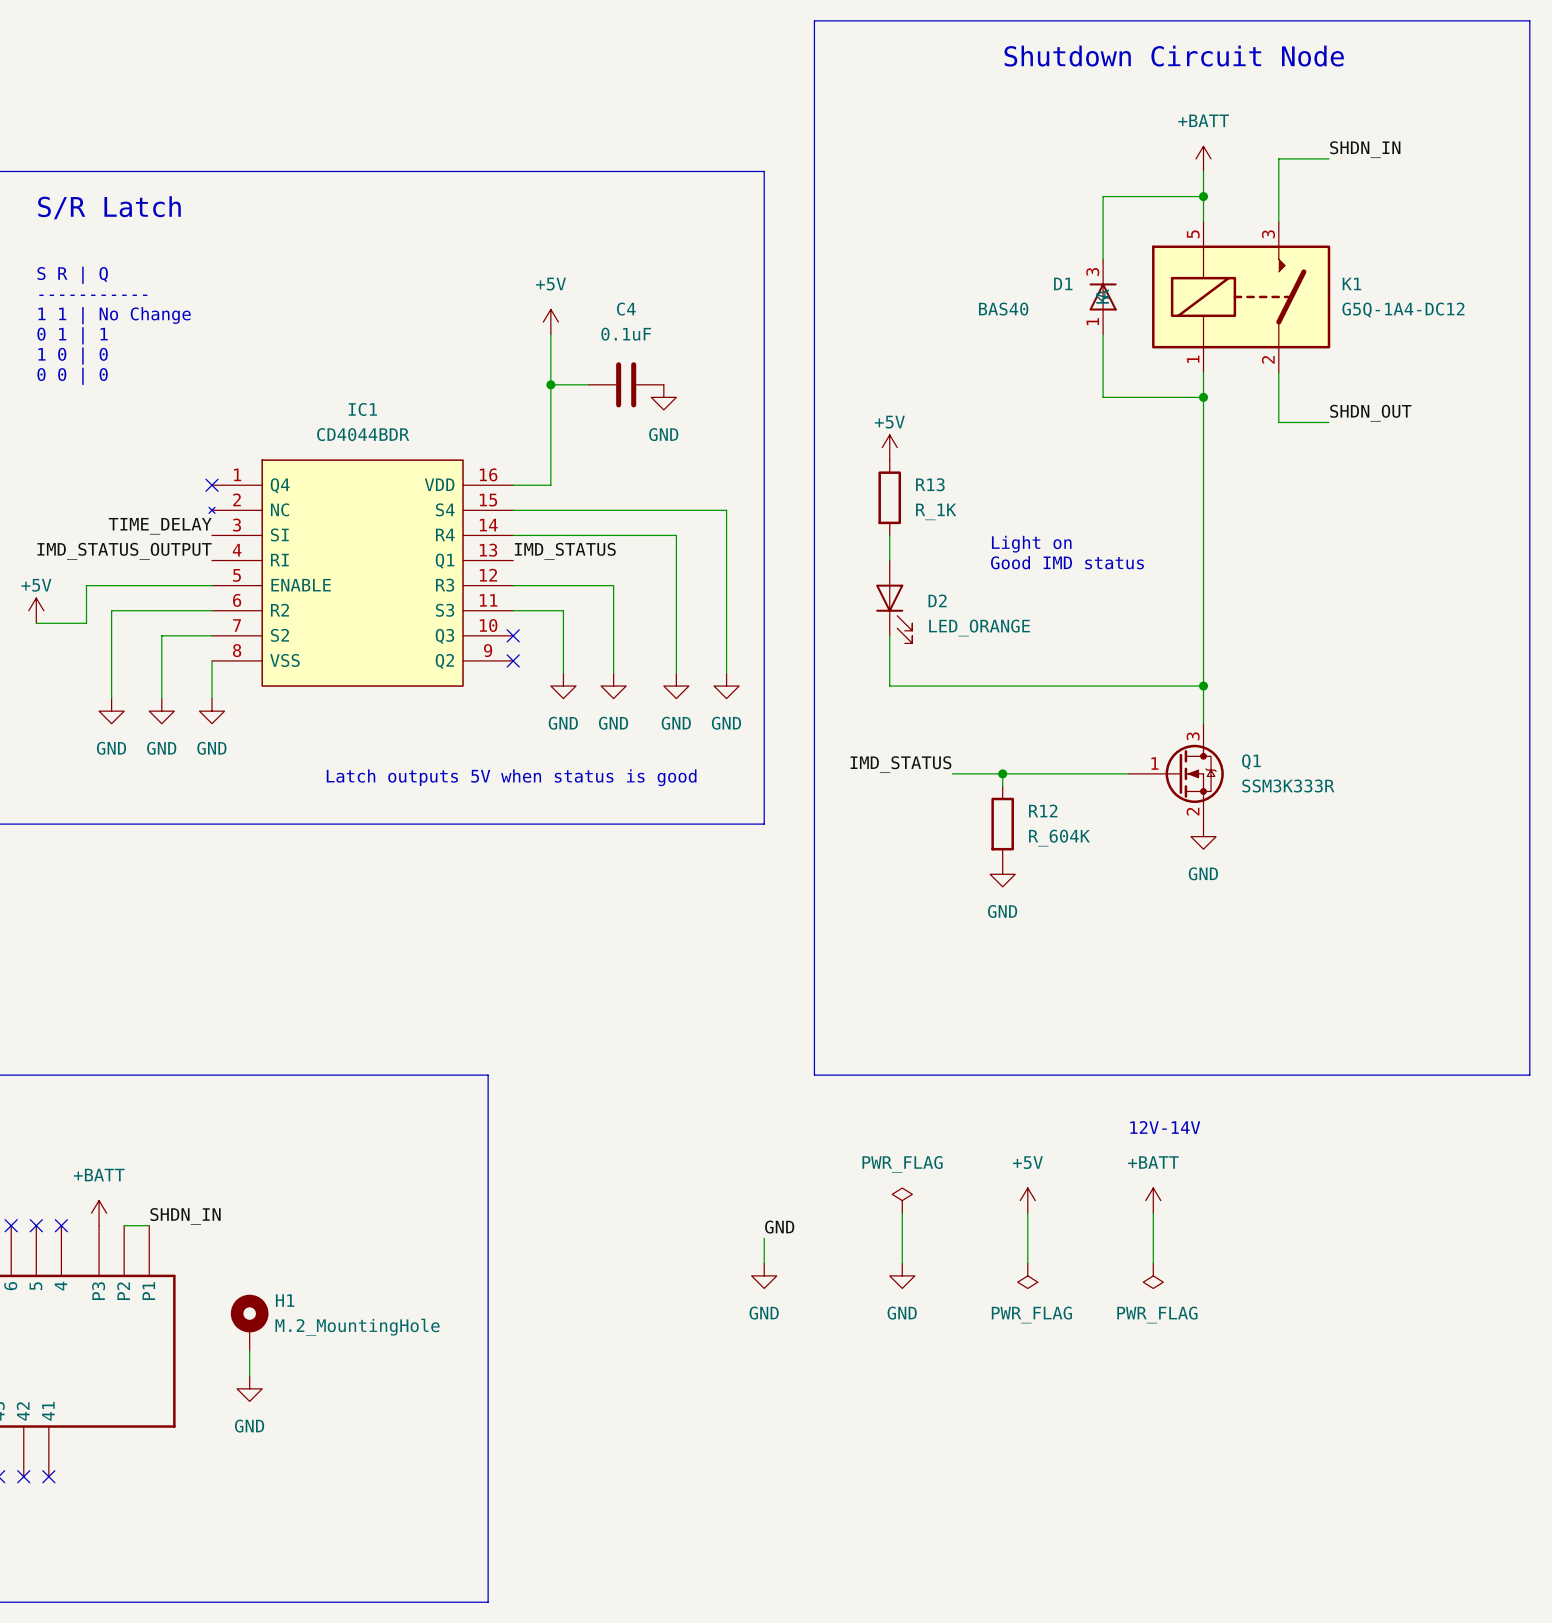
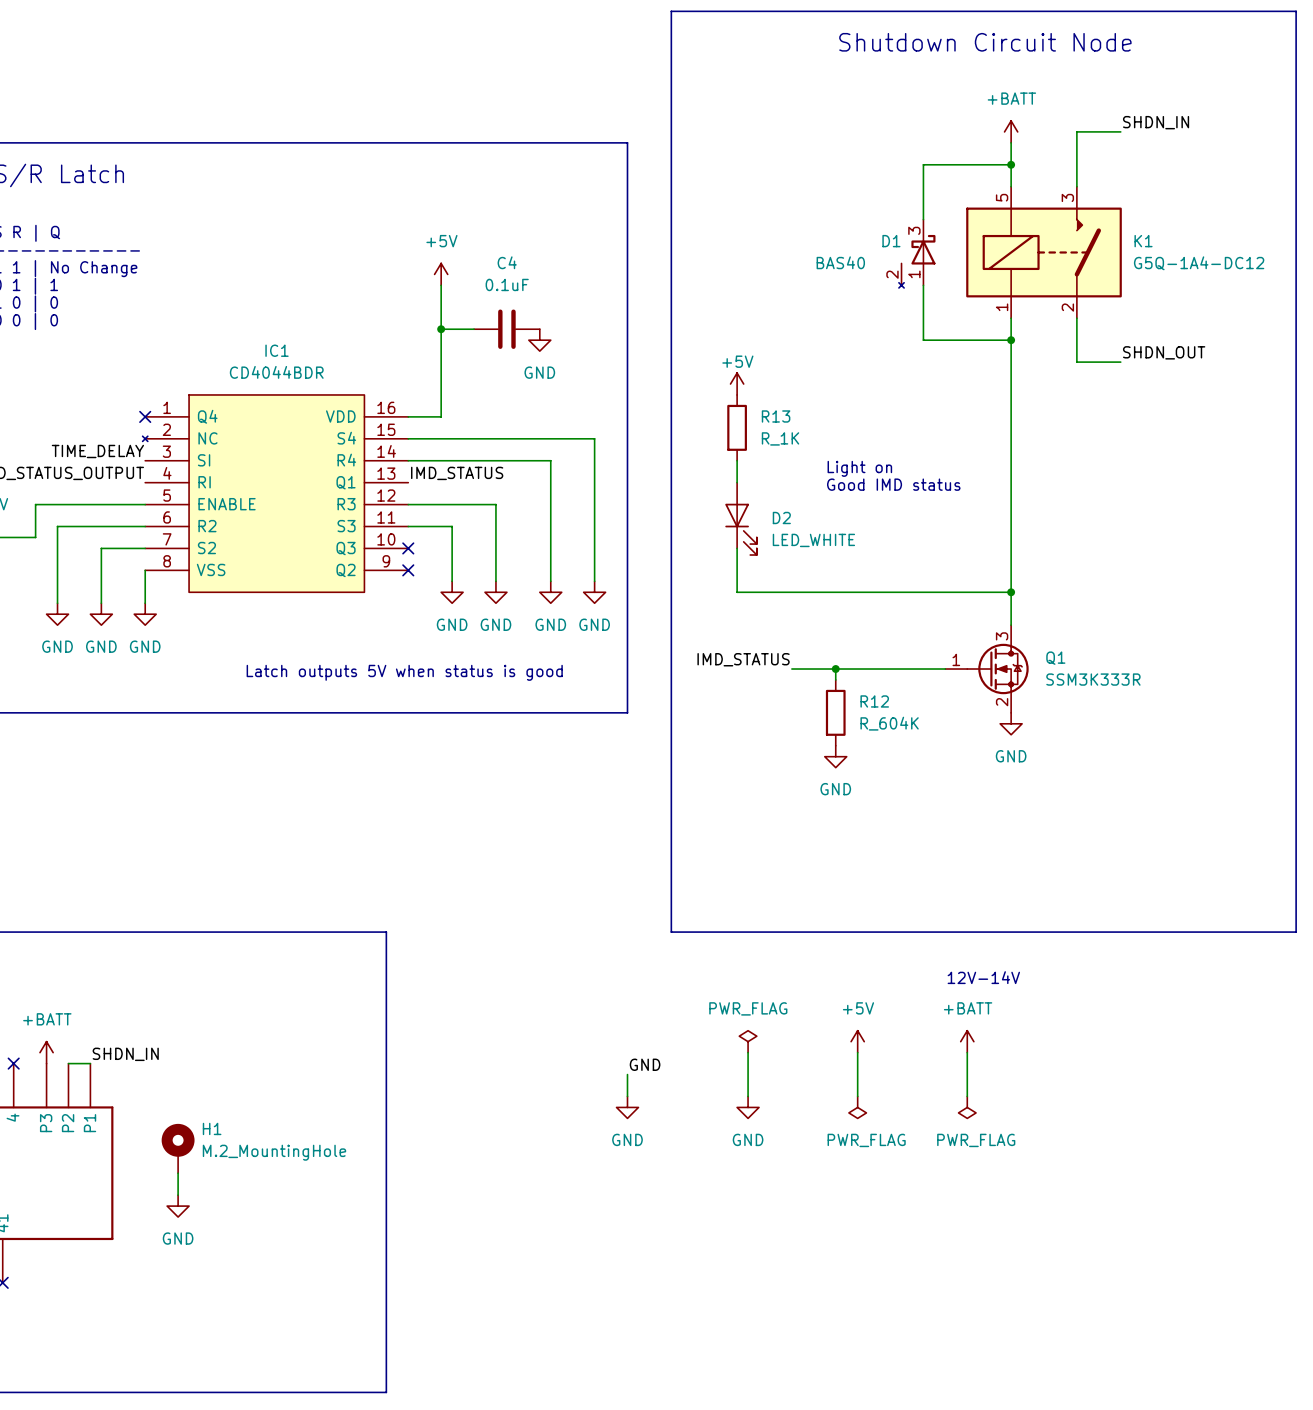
D1 symbol: [1089, 259, 1117, 335] -> [898, 219, 936, 288]
D2 value: LED_ORANGE (979, 628) -> LED_WHITE (813, 540)
Q1 symbol: [1128, 723, 1224, 825] -> [945, 625, 1029, 713]

